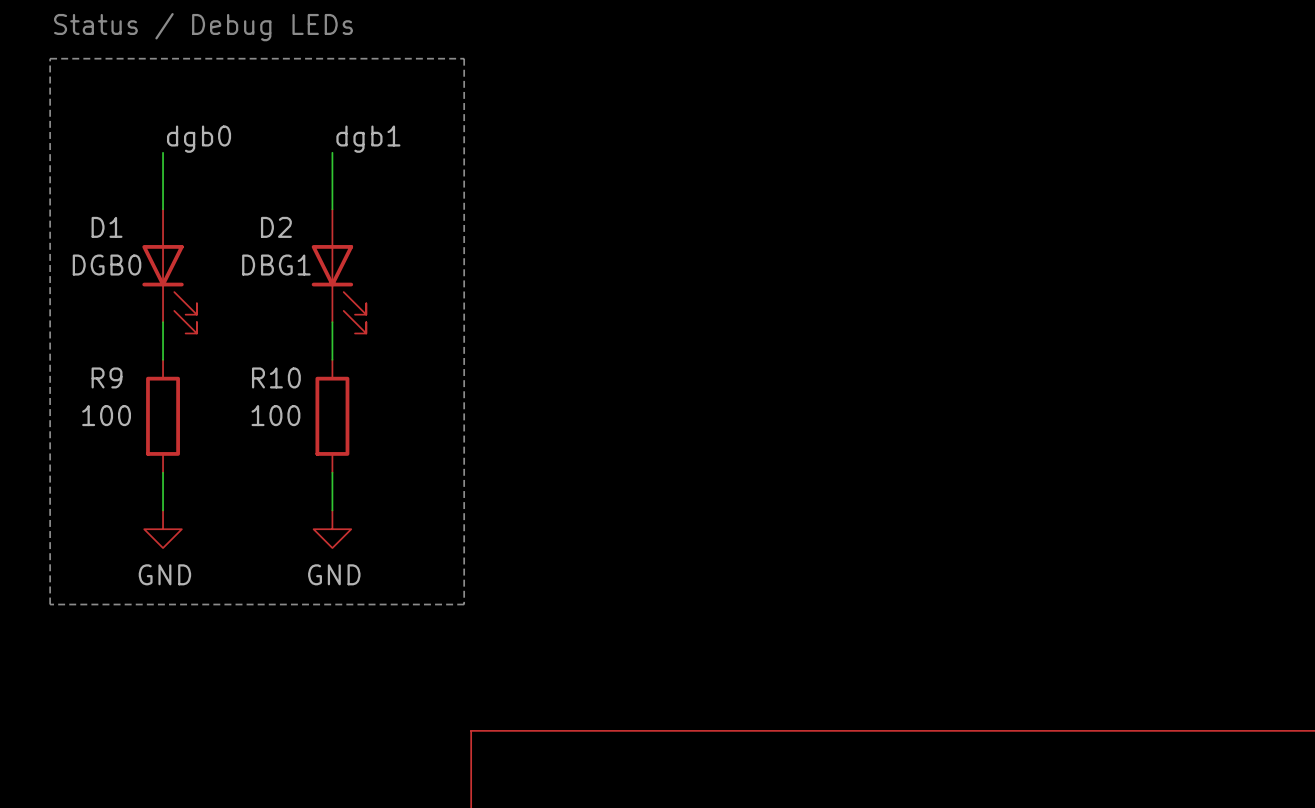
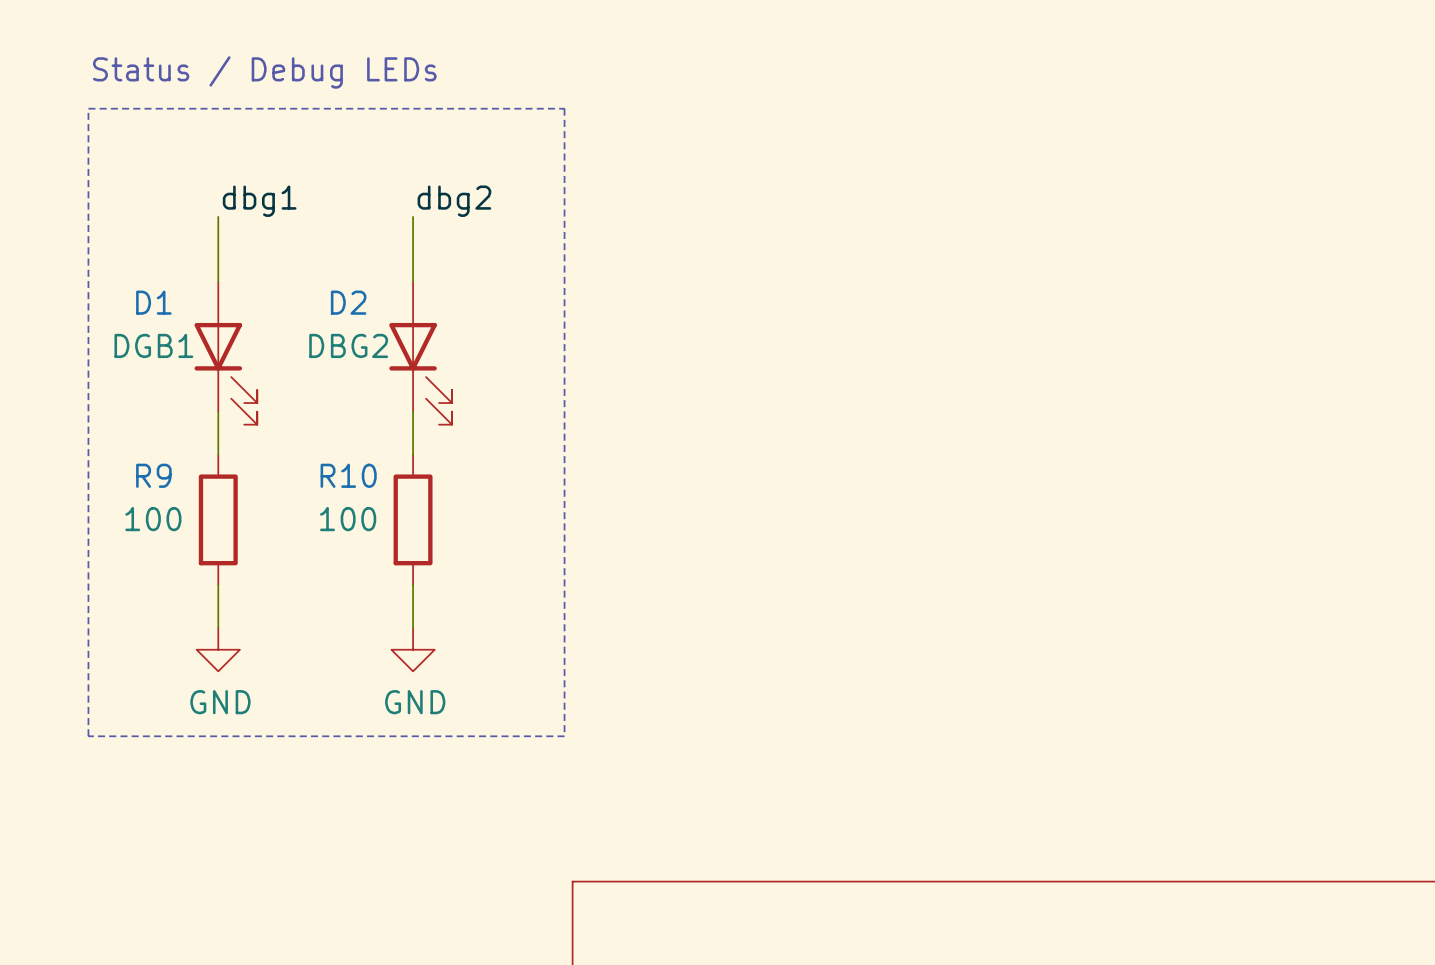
label: dgb0 (199, 139) -> dbg1 (259, 201)
label: dgb1 (368, 139) -> dbg2 (454, 201)
D1 value: DGB0 (107, 265) -> DGB1 (153, 345)
D2 value: DBG1 (276, 265) -> DBG2 (348, 345)

